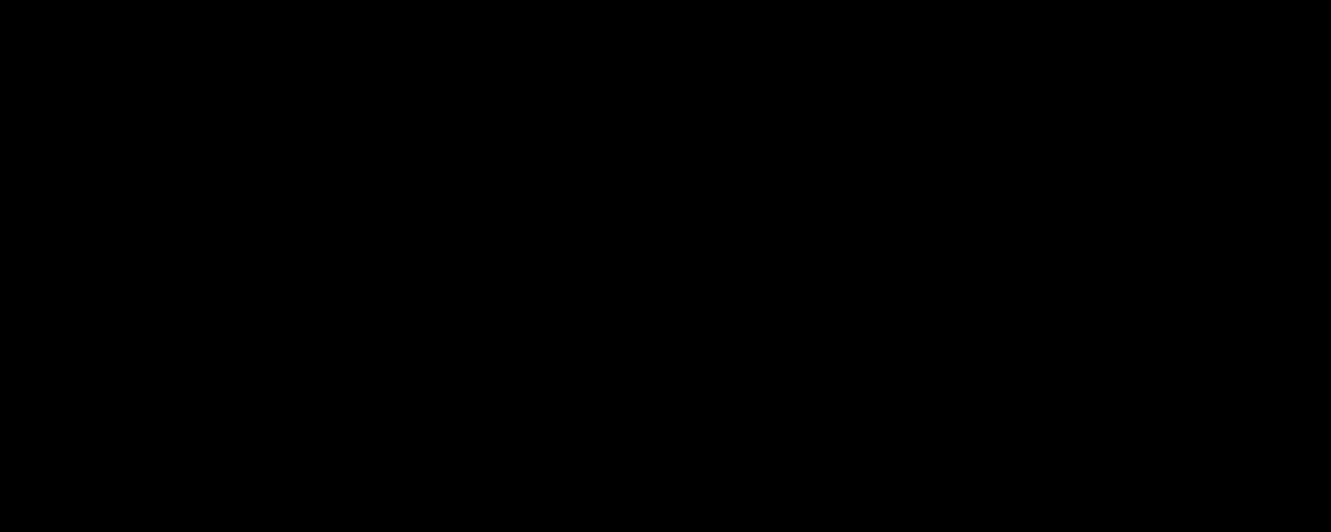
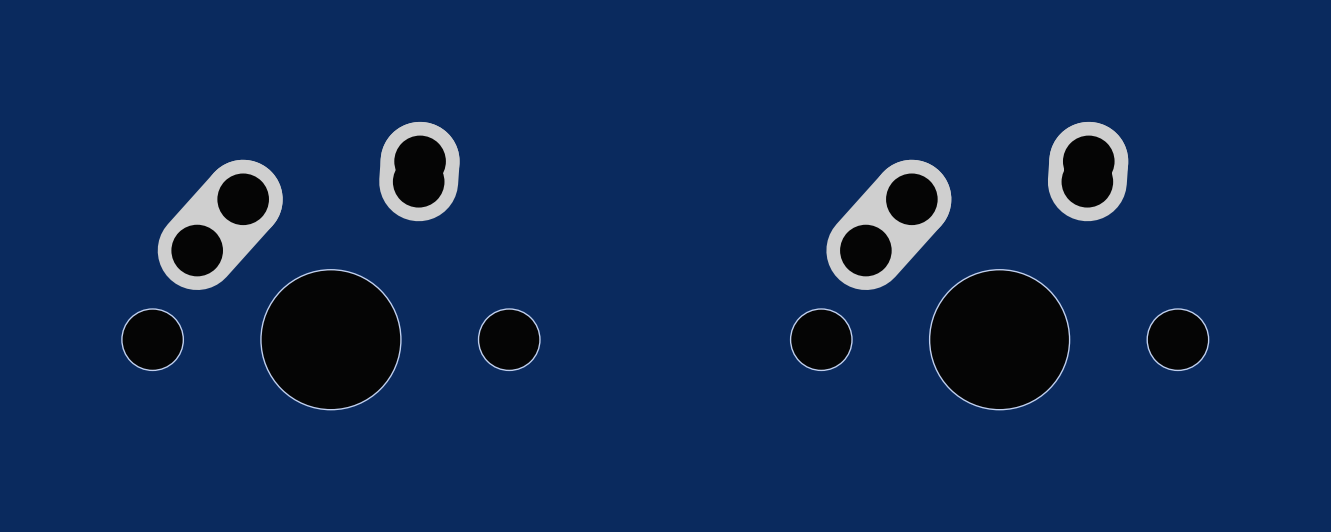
part: none -> (330, 265)
part: none -> (999, 265)

